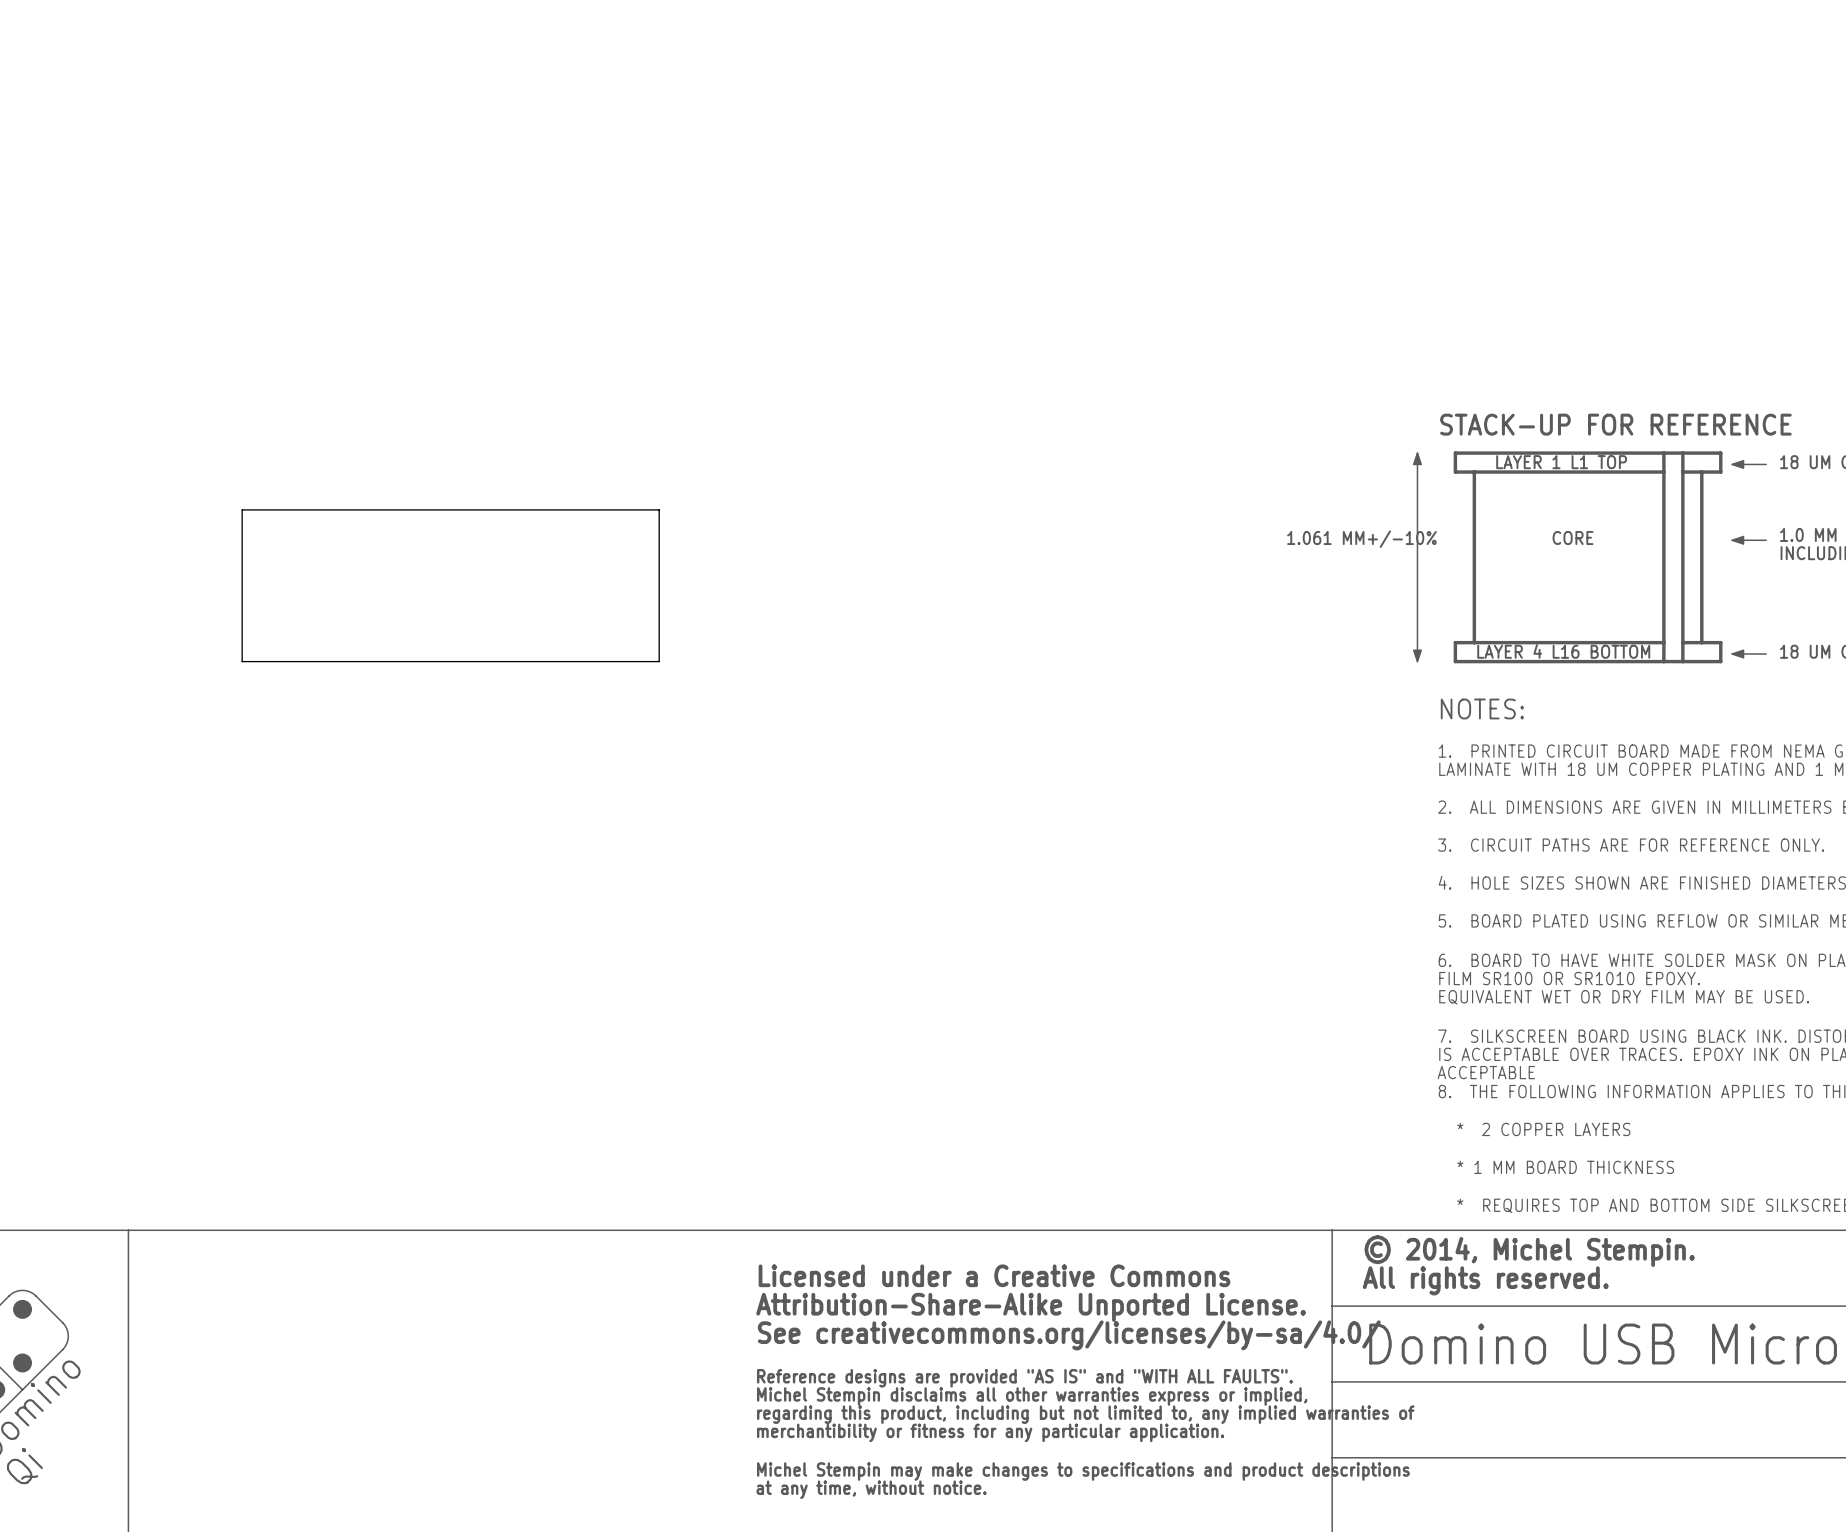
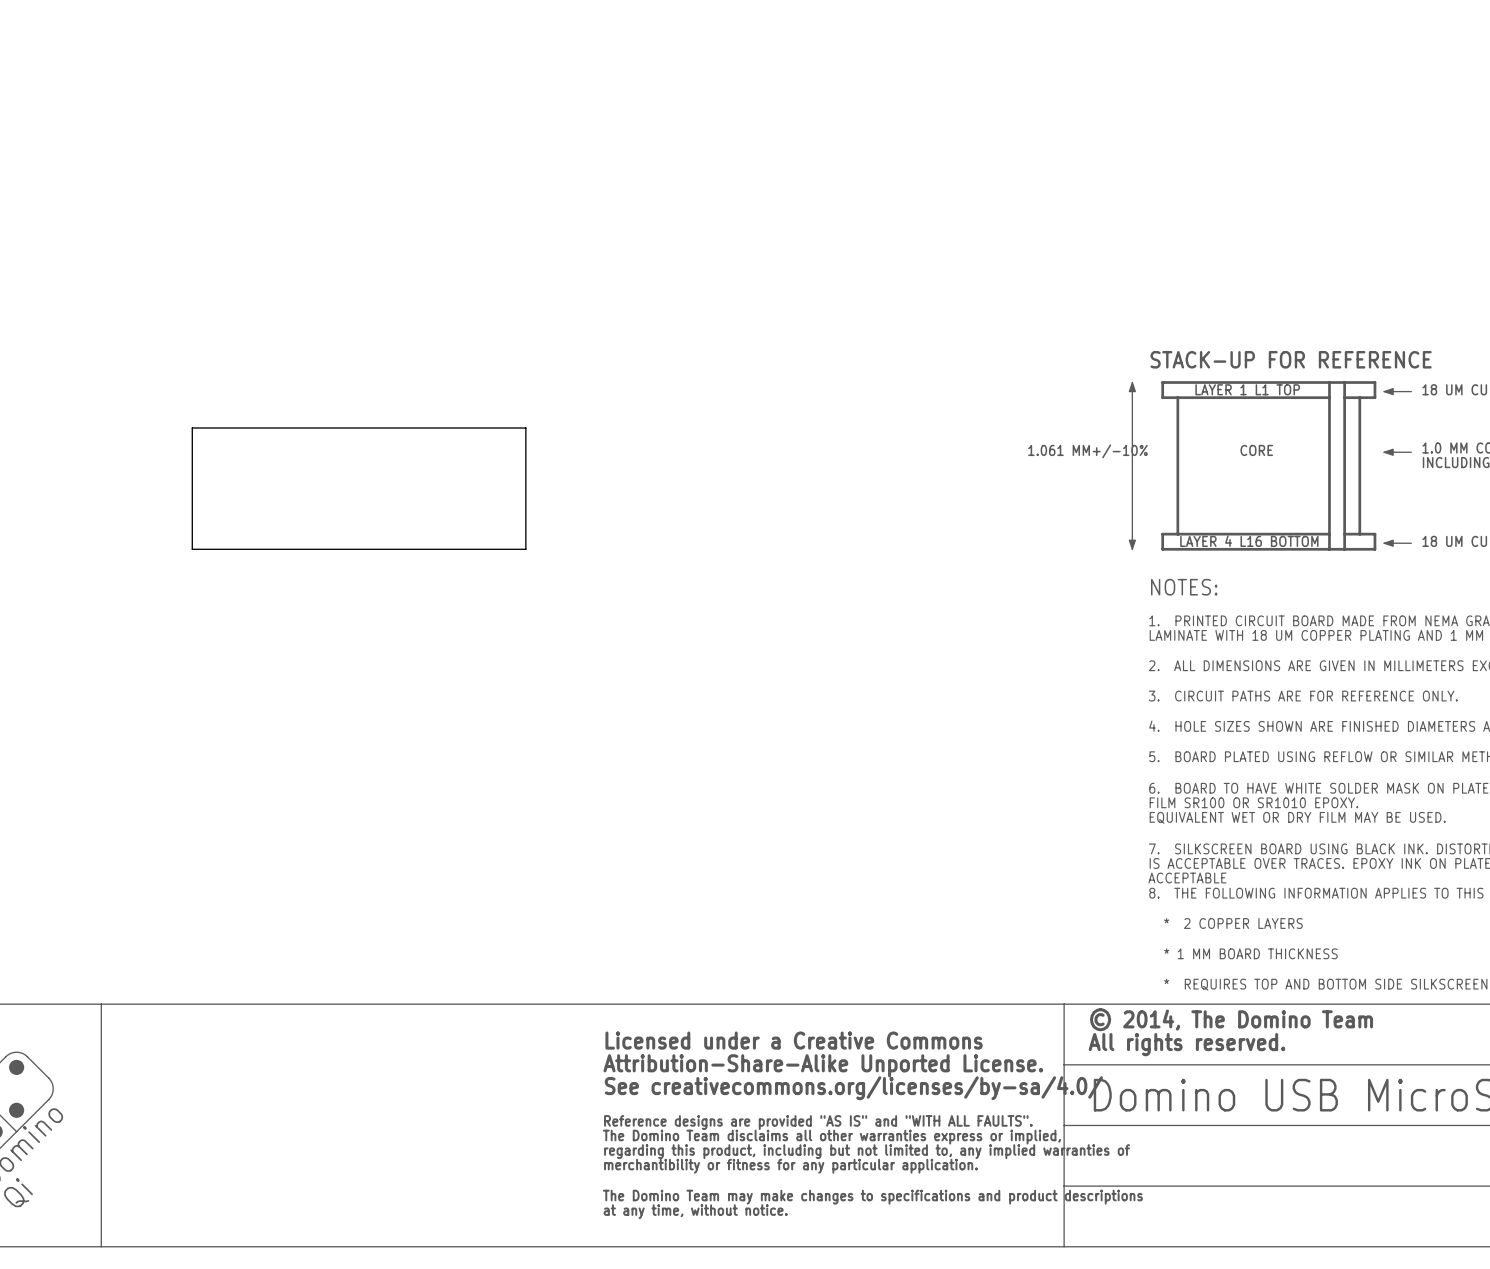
text: © 2014, Michel Stempin. (1529, 1251) -> © 2014, The Domino Team (1231, 1019)
text: Michel Stempin disclaims all other warranties express or implied, (1032, 1396) -> The Domino Team disclaims all other warranties express or implied, (831, 1137)
text: Michel Stempin may make changes to specifications and product descriptions (1083, 1471) -> The Domino Team may make changes to specifications and product descriptions (872, 1197)

